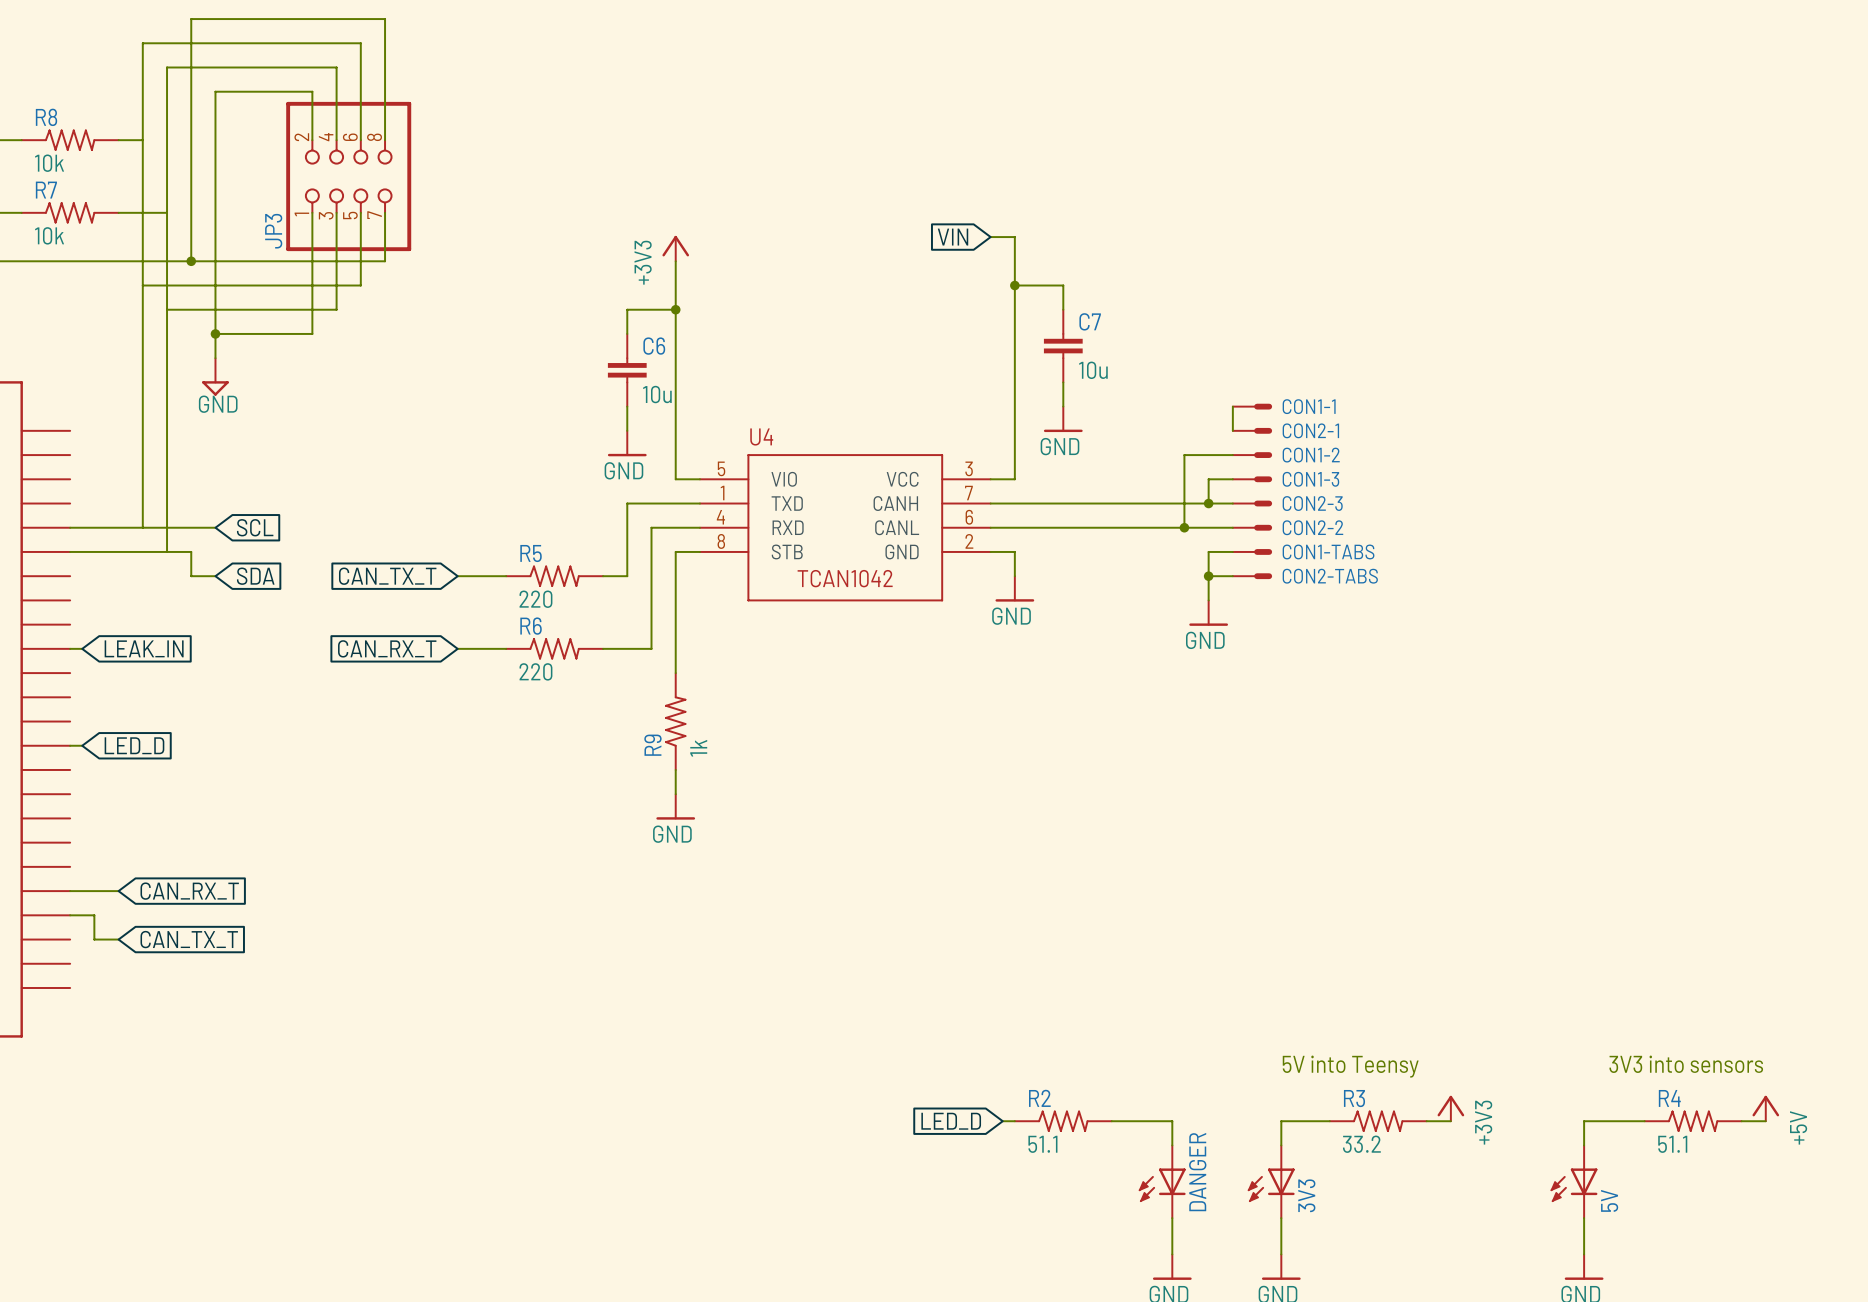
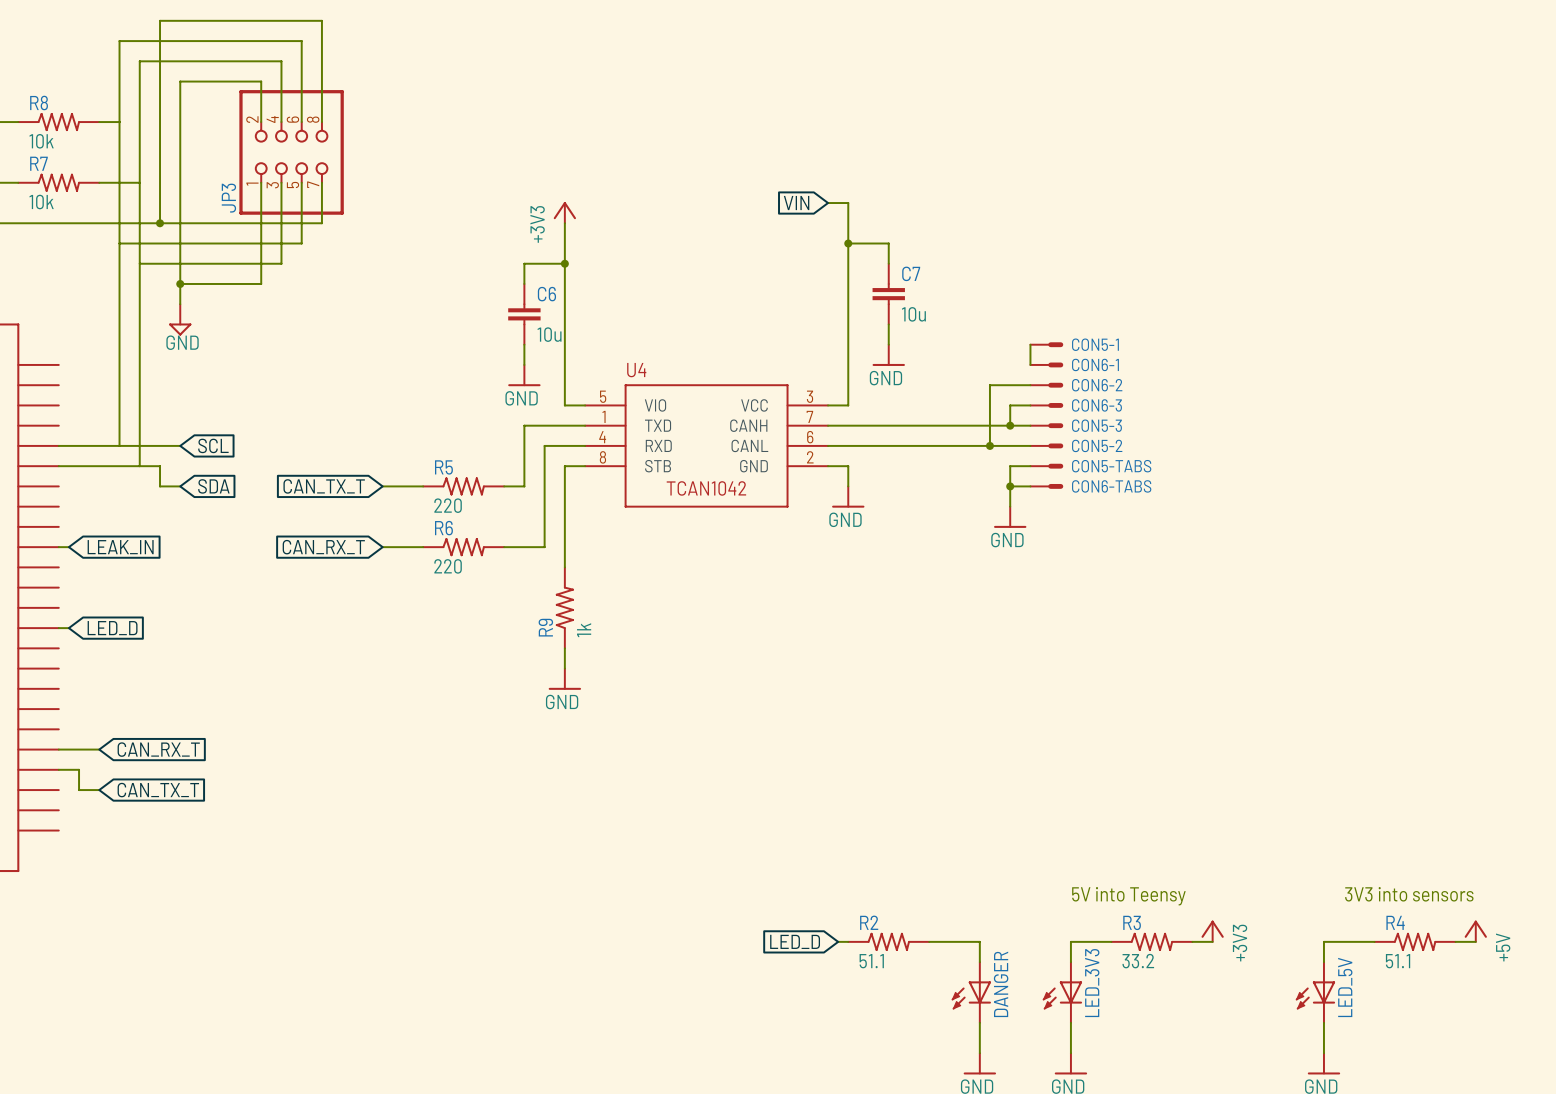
CON1-1 name: CON1-1 (1309, 406) -> CON5-1 (1095, 344)
CON2-1 name: CON2-1 (1310, 430) -> CON6-1 (1095, 364)
CON1-2 name: CON1-2 (1311, 455) -> CON6-2 (1097, 385)
CON1-3 name: CON1-3 (1310, 479) -> CON6-3 (1096, 405)
CON2-3 name: CON2-3 (1312, 503) -> CON5-3 (1096, 425)
CON2-2 name: CON2-2 (1312, 527) -> CON5-2 (1097, 445)
CON1-TABS name: CON1-TABS (1328, 551) -> CON5-TABS (1111, 466)
CON2-TABS name: CON2-TABS (1330, 576) -> CON6-TABS (1111, 486)
3V3 name: 3V3 (1306, 1195) -> LED_3V3 (1092, 983)
5V name: 5V (1609, 1200) -> LED_5V (1345, 987)

